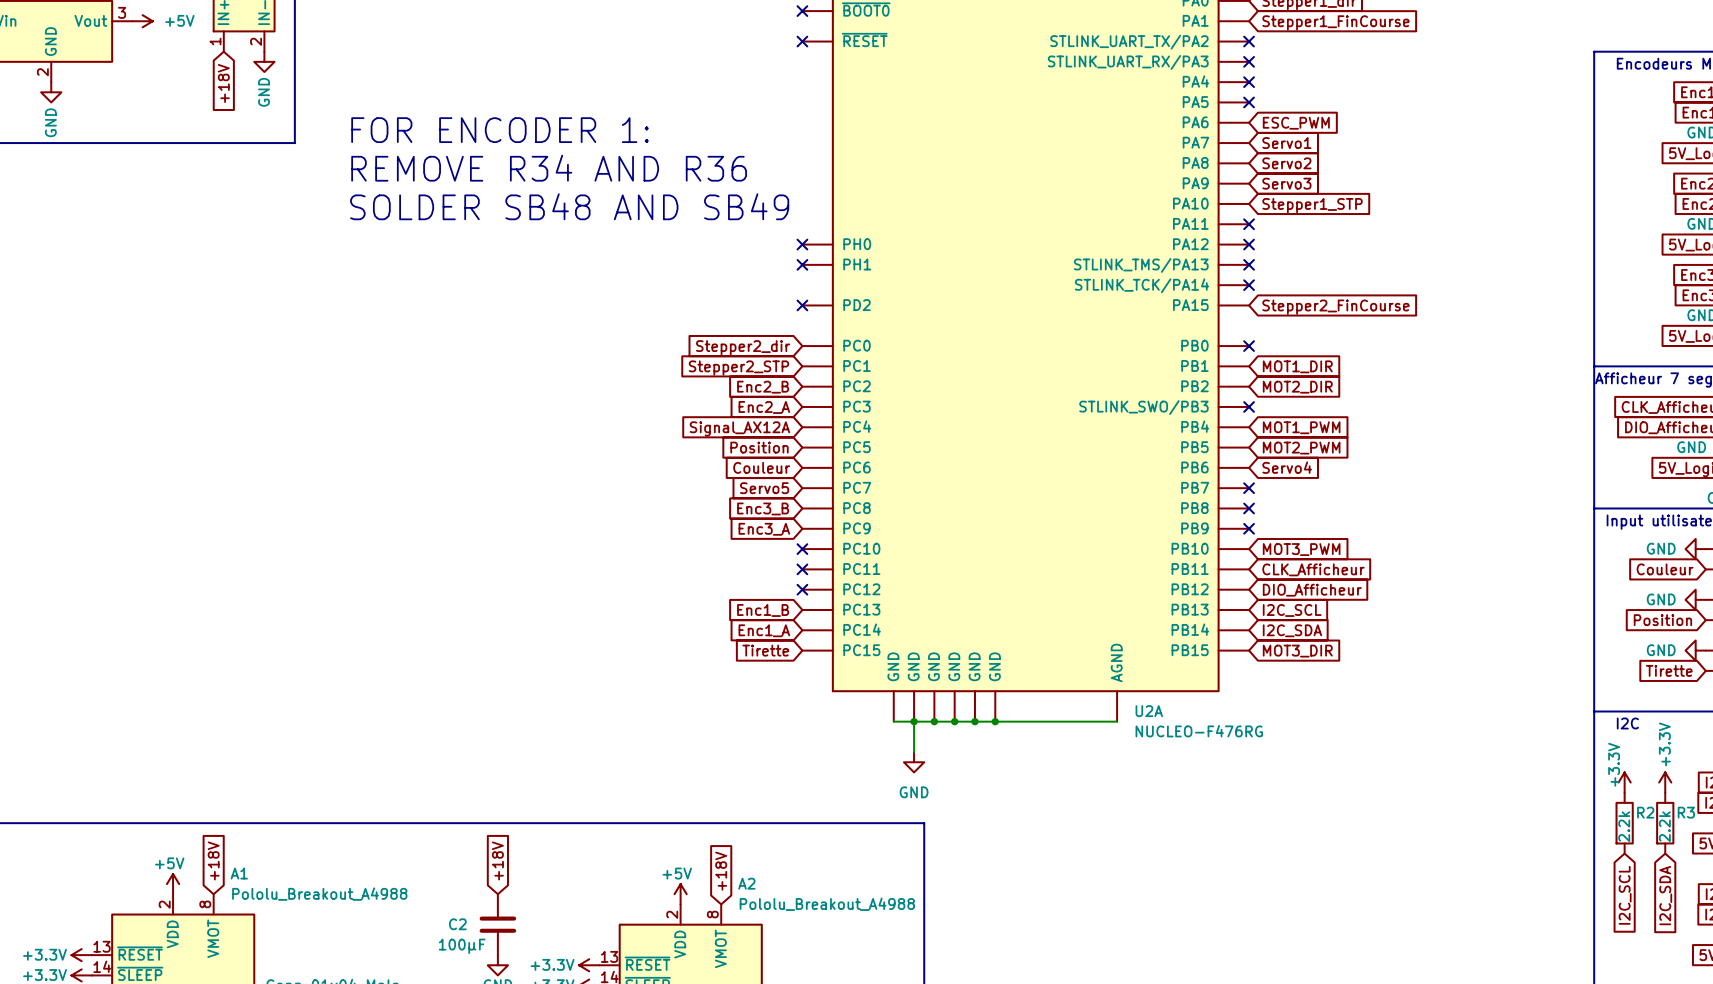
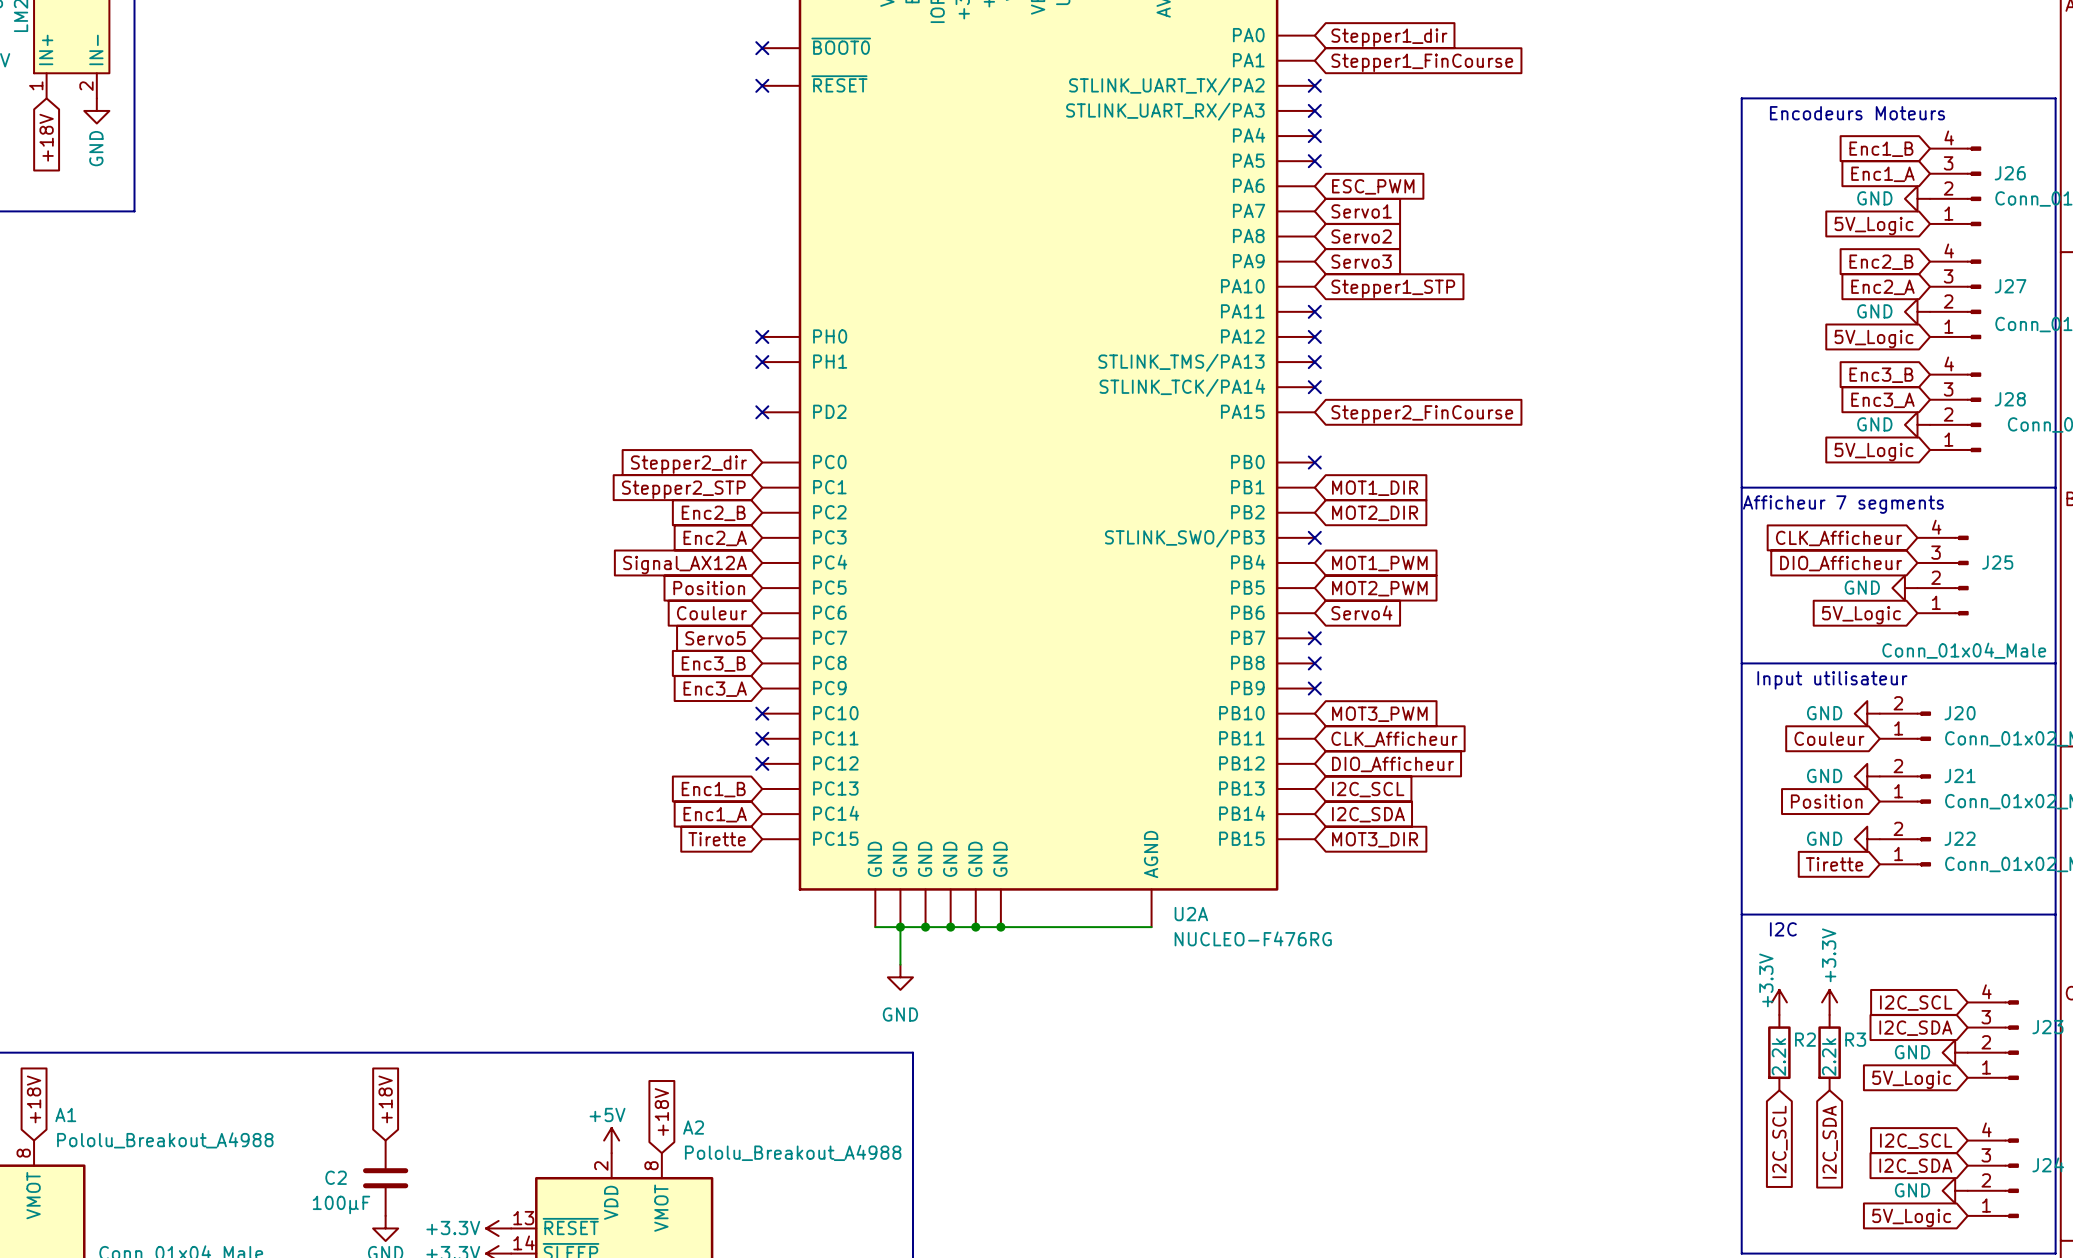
text: FOR ENCODER 1: (500, 130) -> none
text: REMOVE R34 AND R36 (549, 168) -> none
text: SOLDER SB48 AND SB49 (569, 206) -> none

